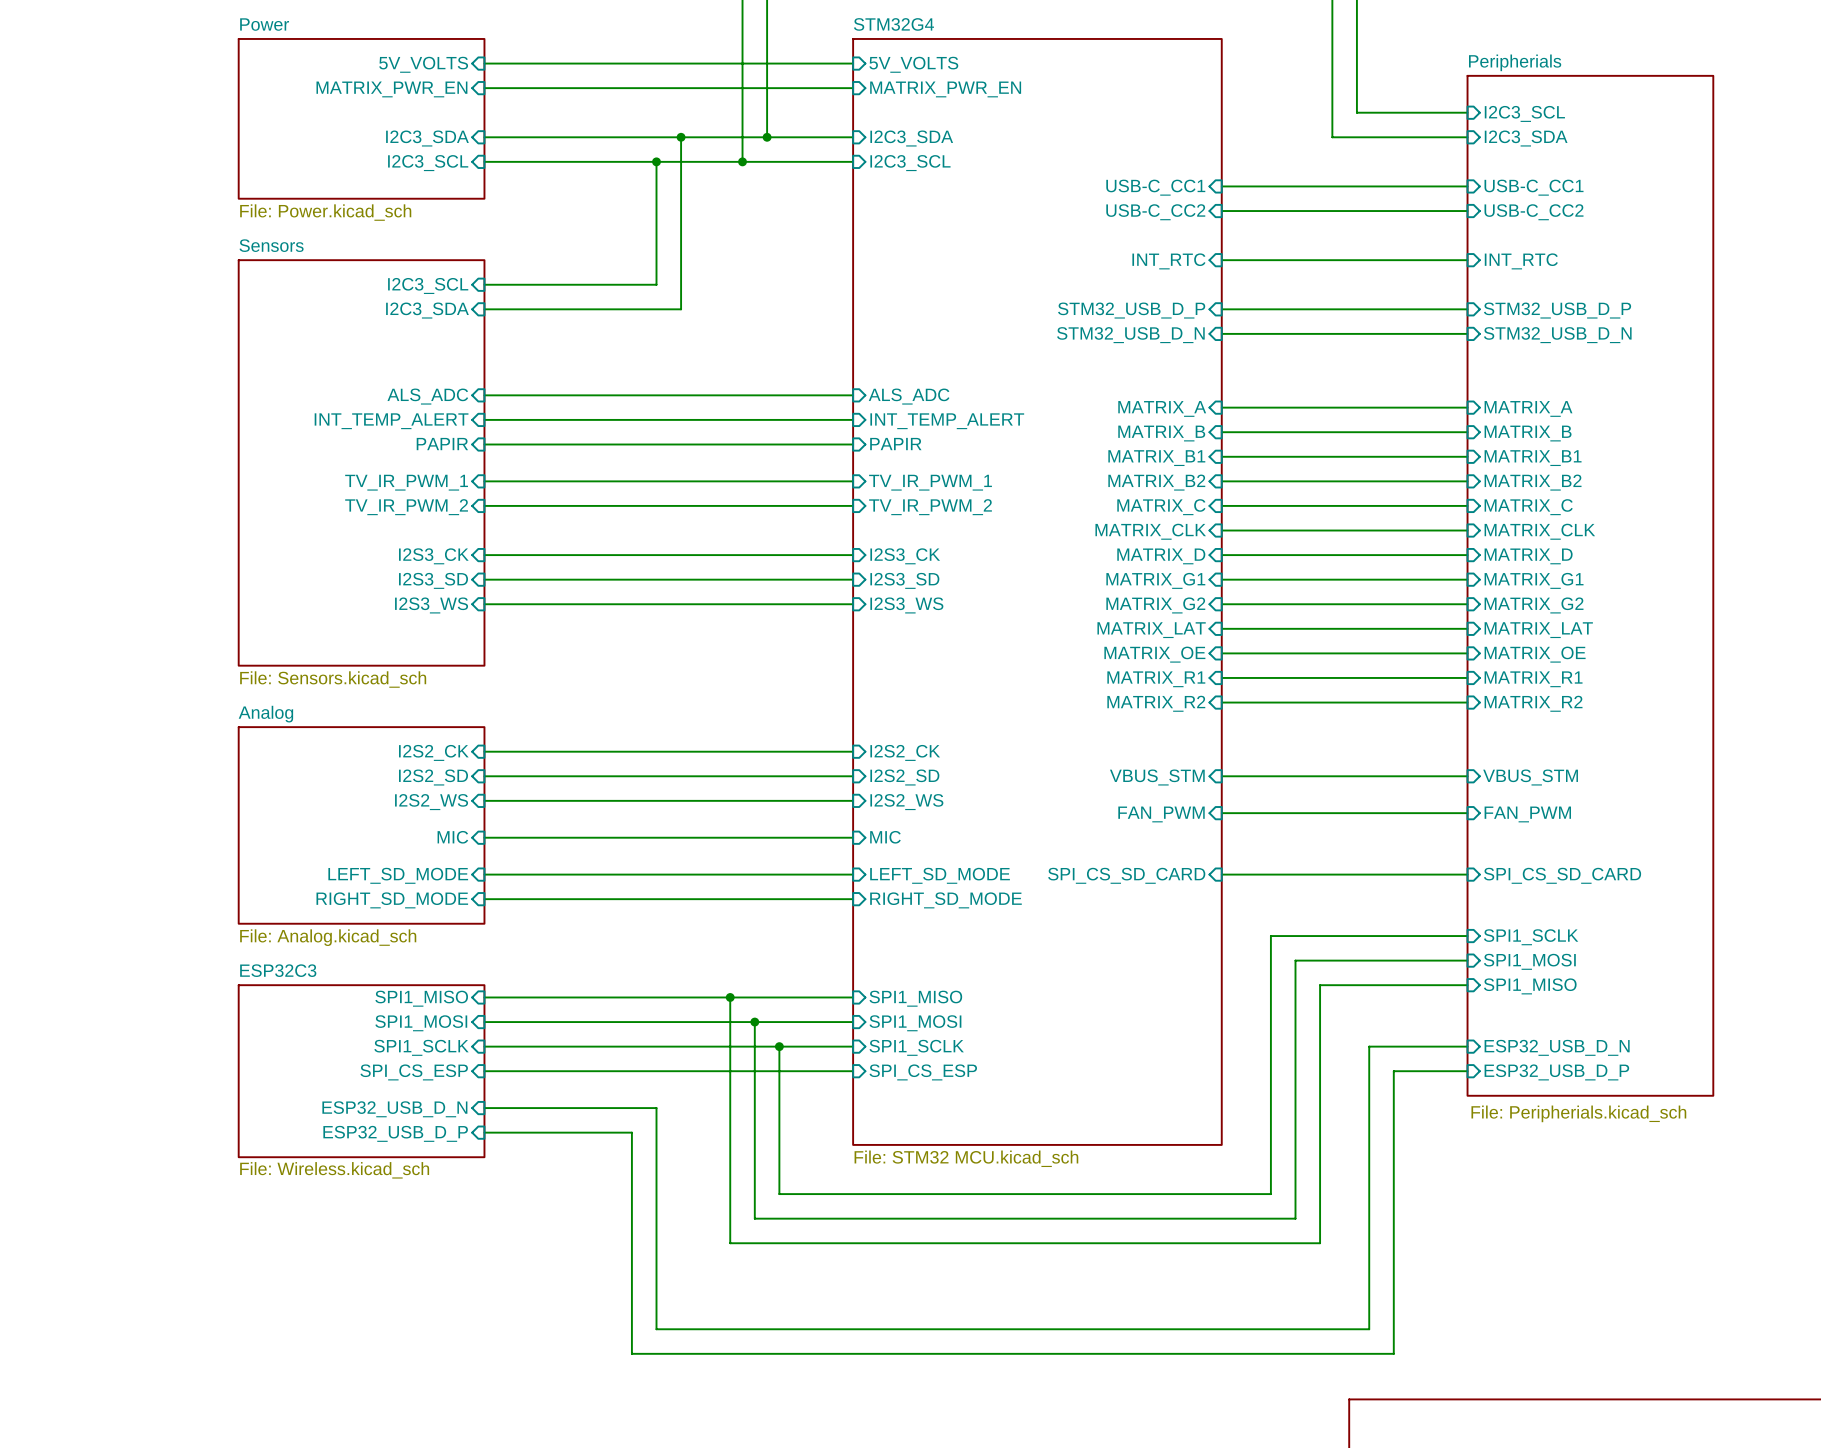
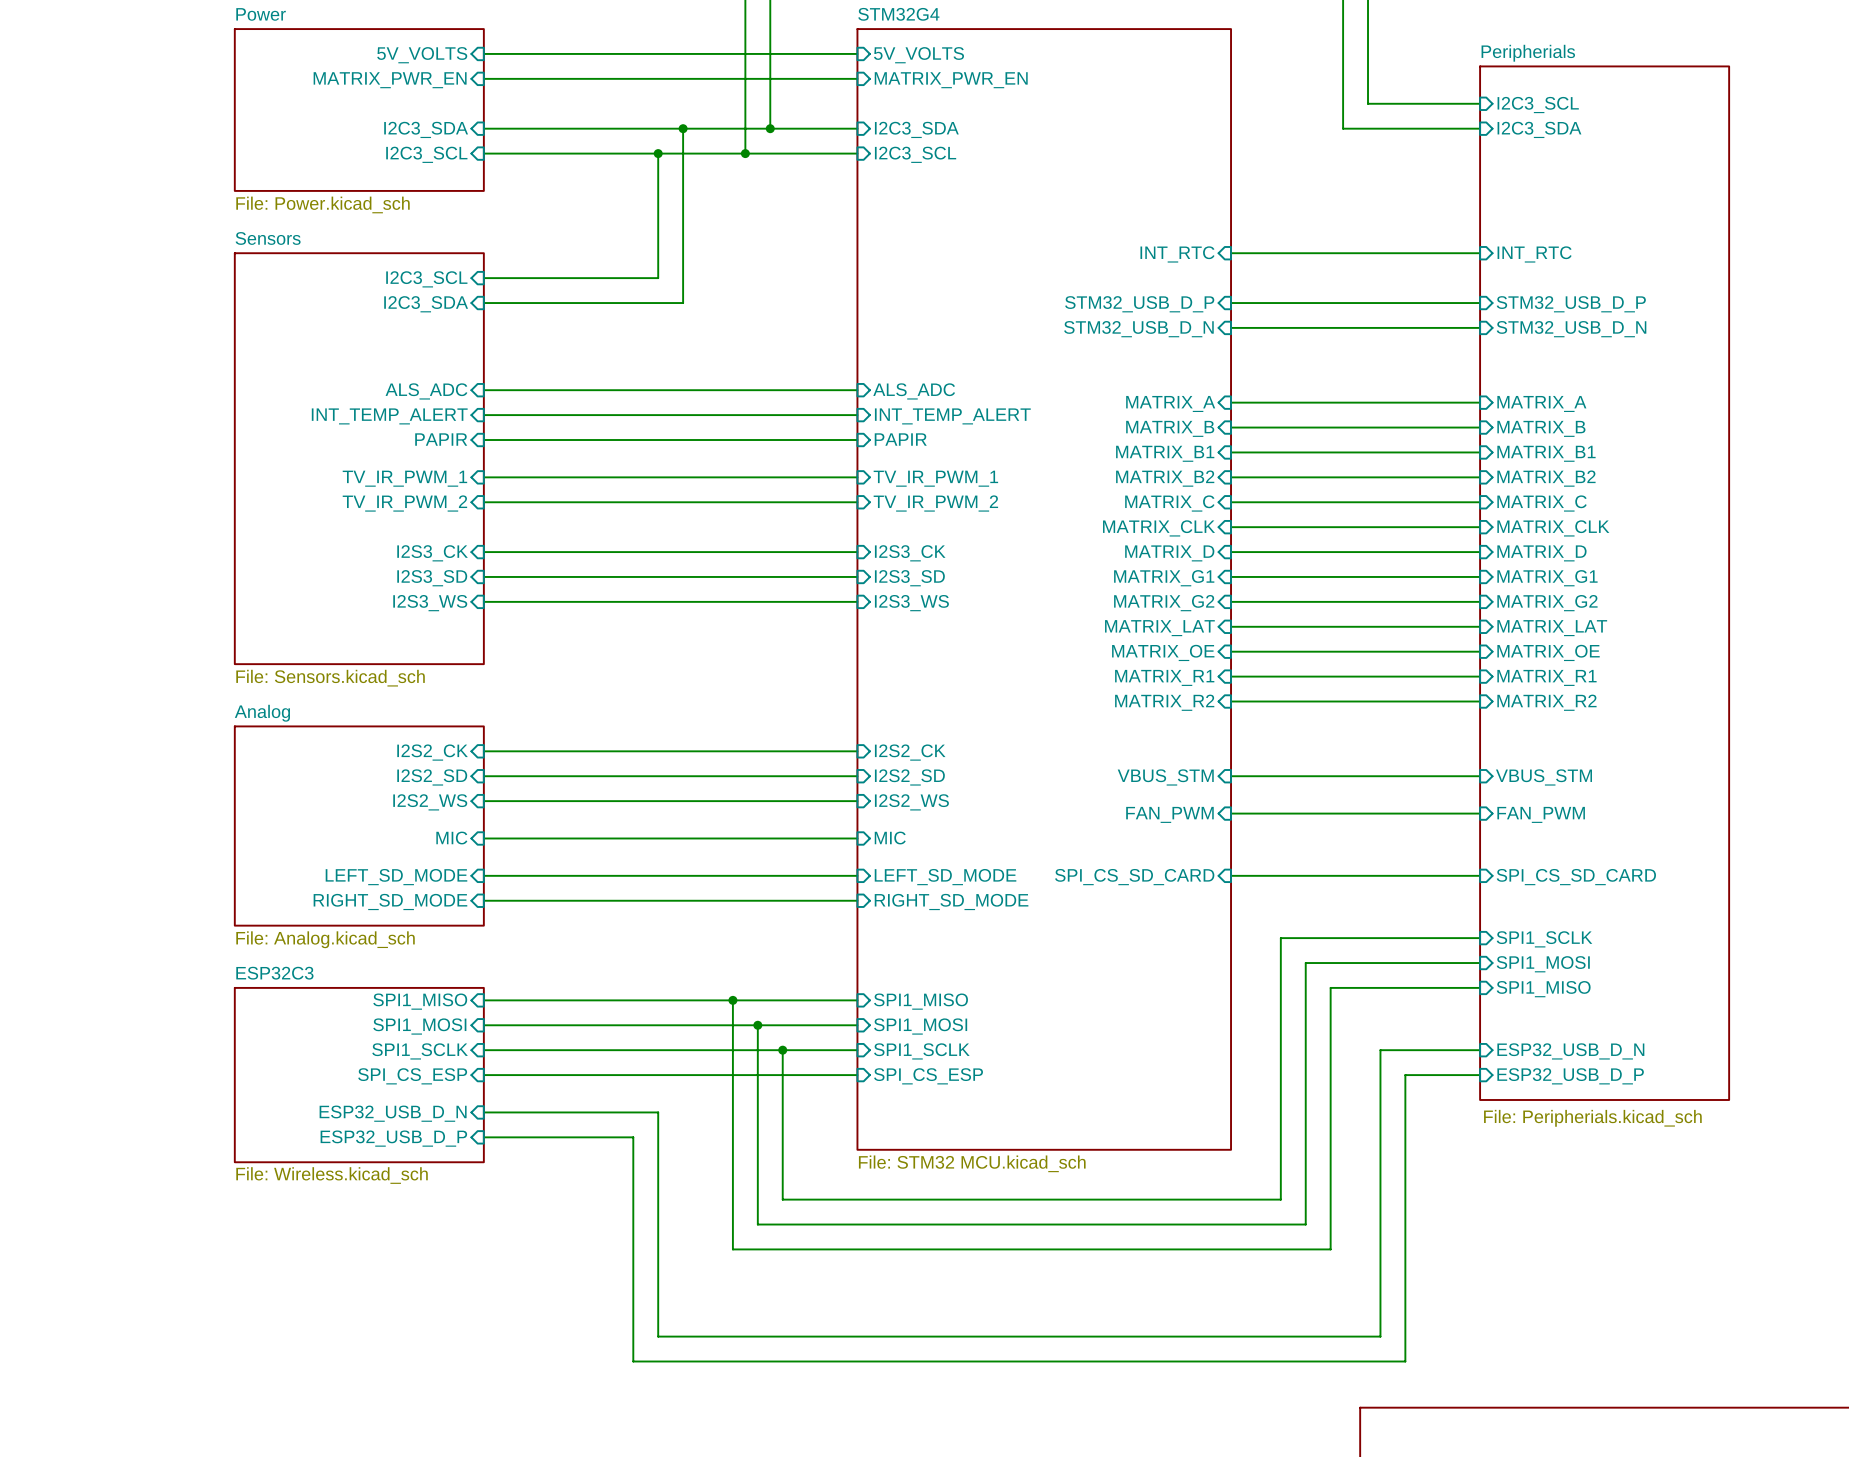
wire: (1221, 186) (1467, 186) -> none
sheet pin: USB-C_CC1 (1155, 187) -> none
sheet pin: USB-C_CC1 (1534, 187) -> none
wire: (1221, 211) (1467, 211) -> none
sheet pin: USB-C_CC2 (1155, 212) -> none
sheet pin: USB-C_CC2 (1534, 212) -> none

